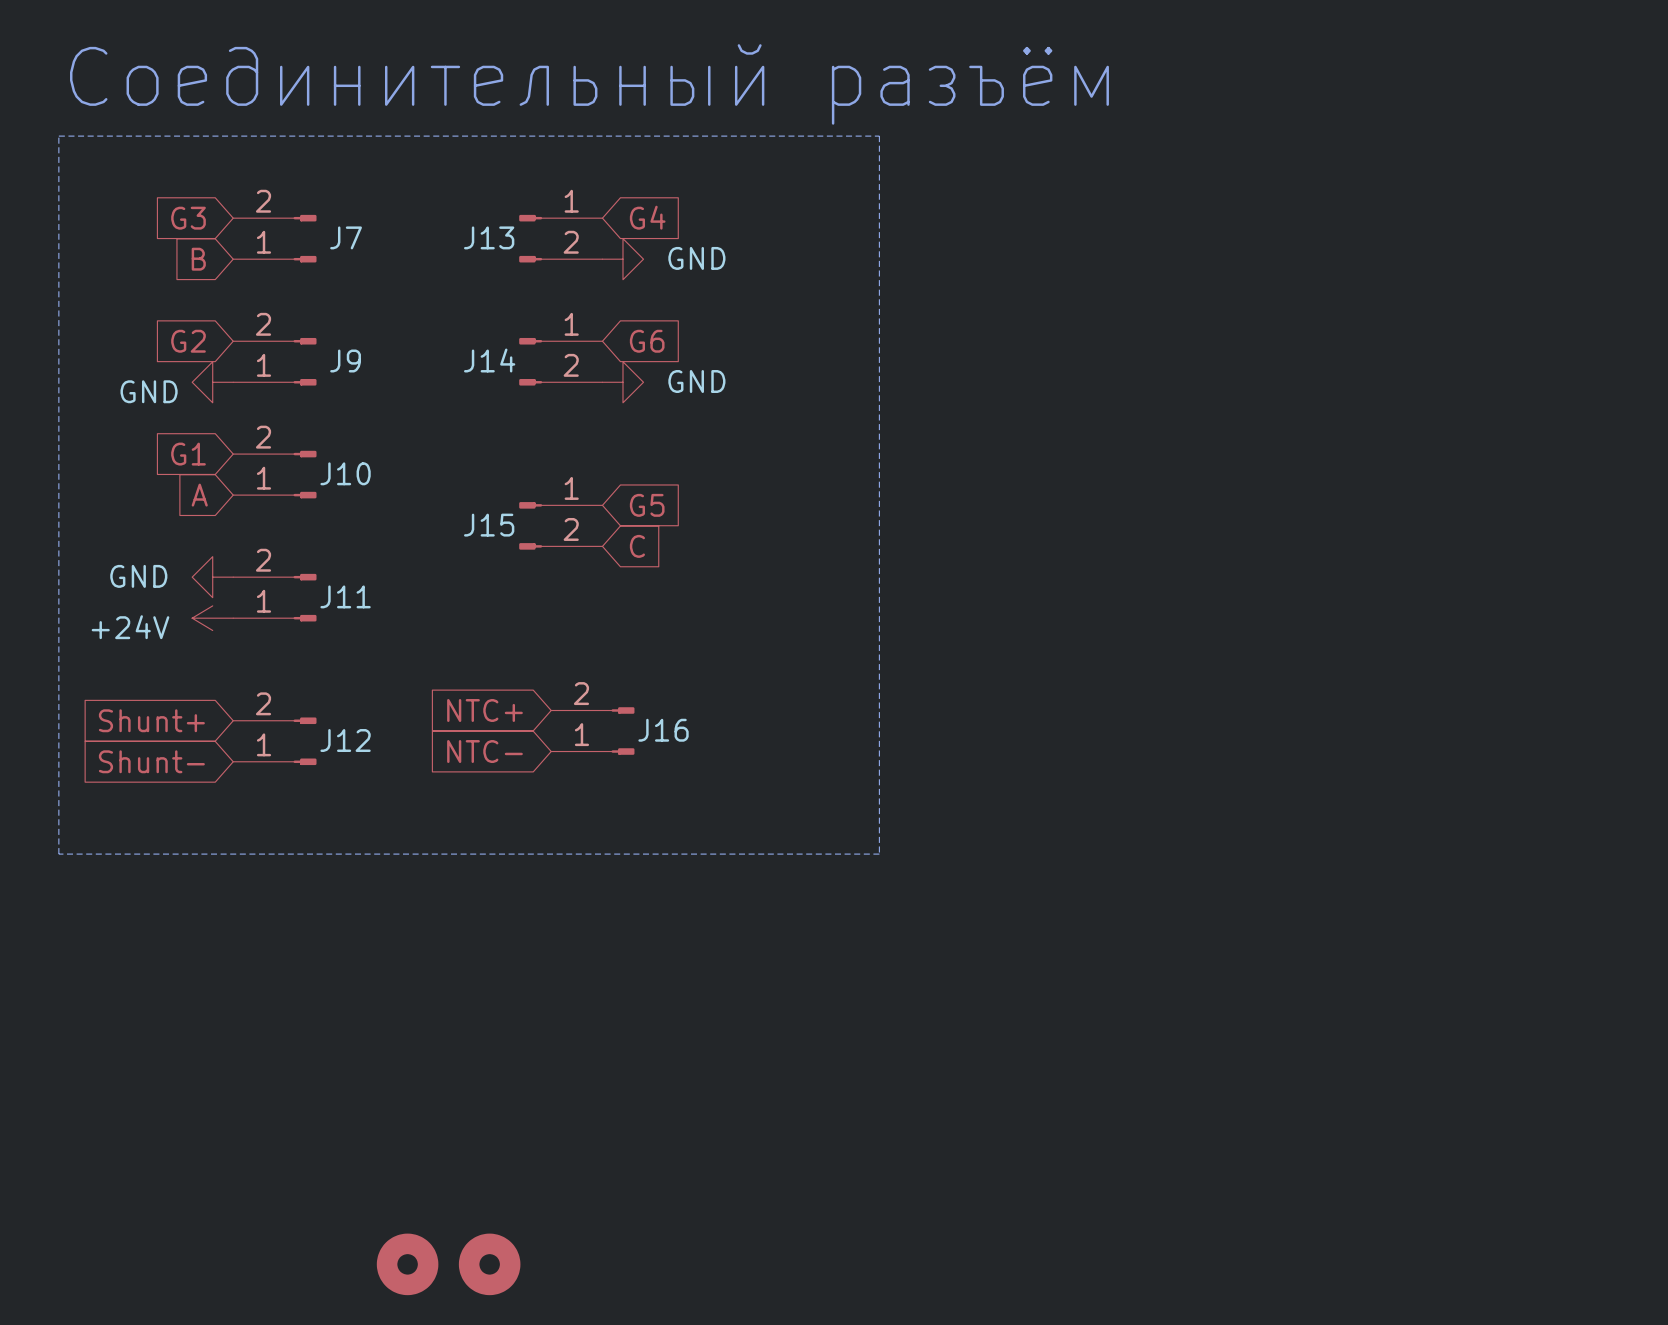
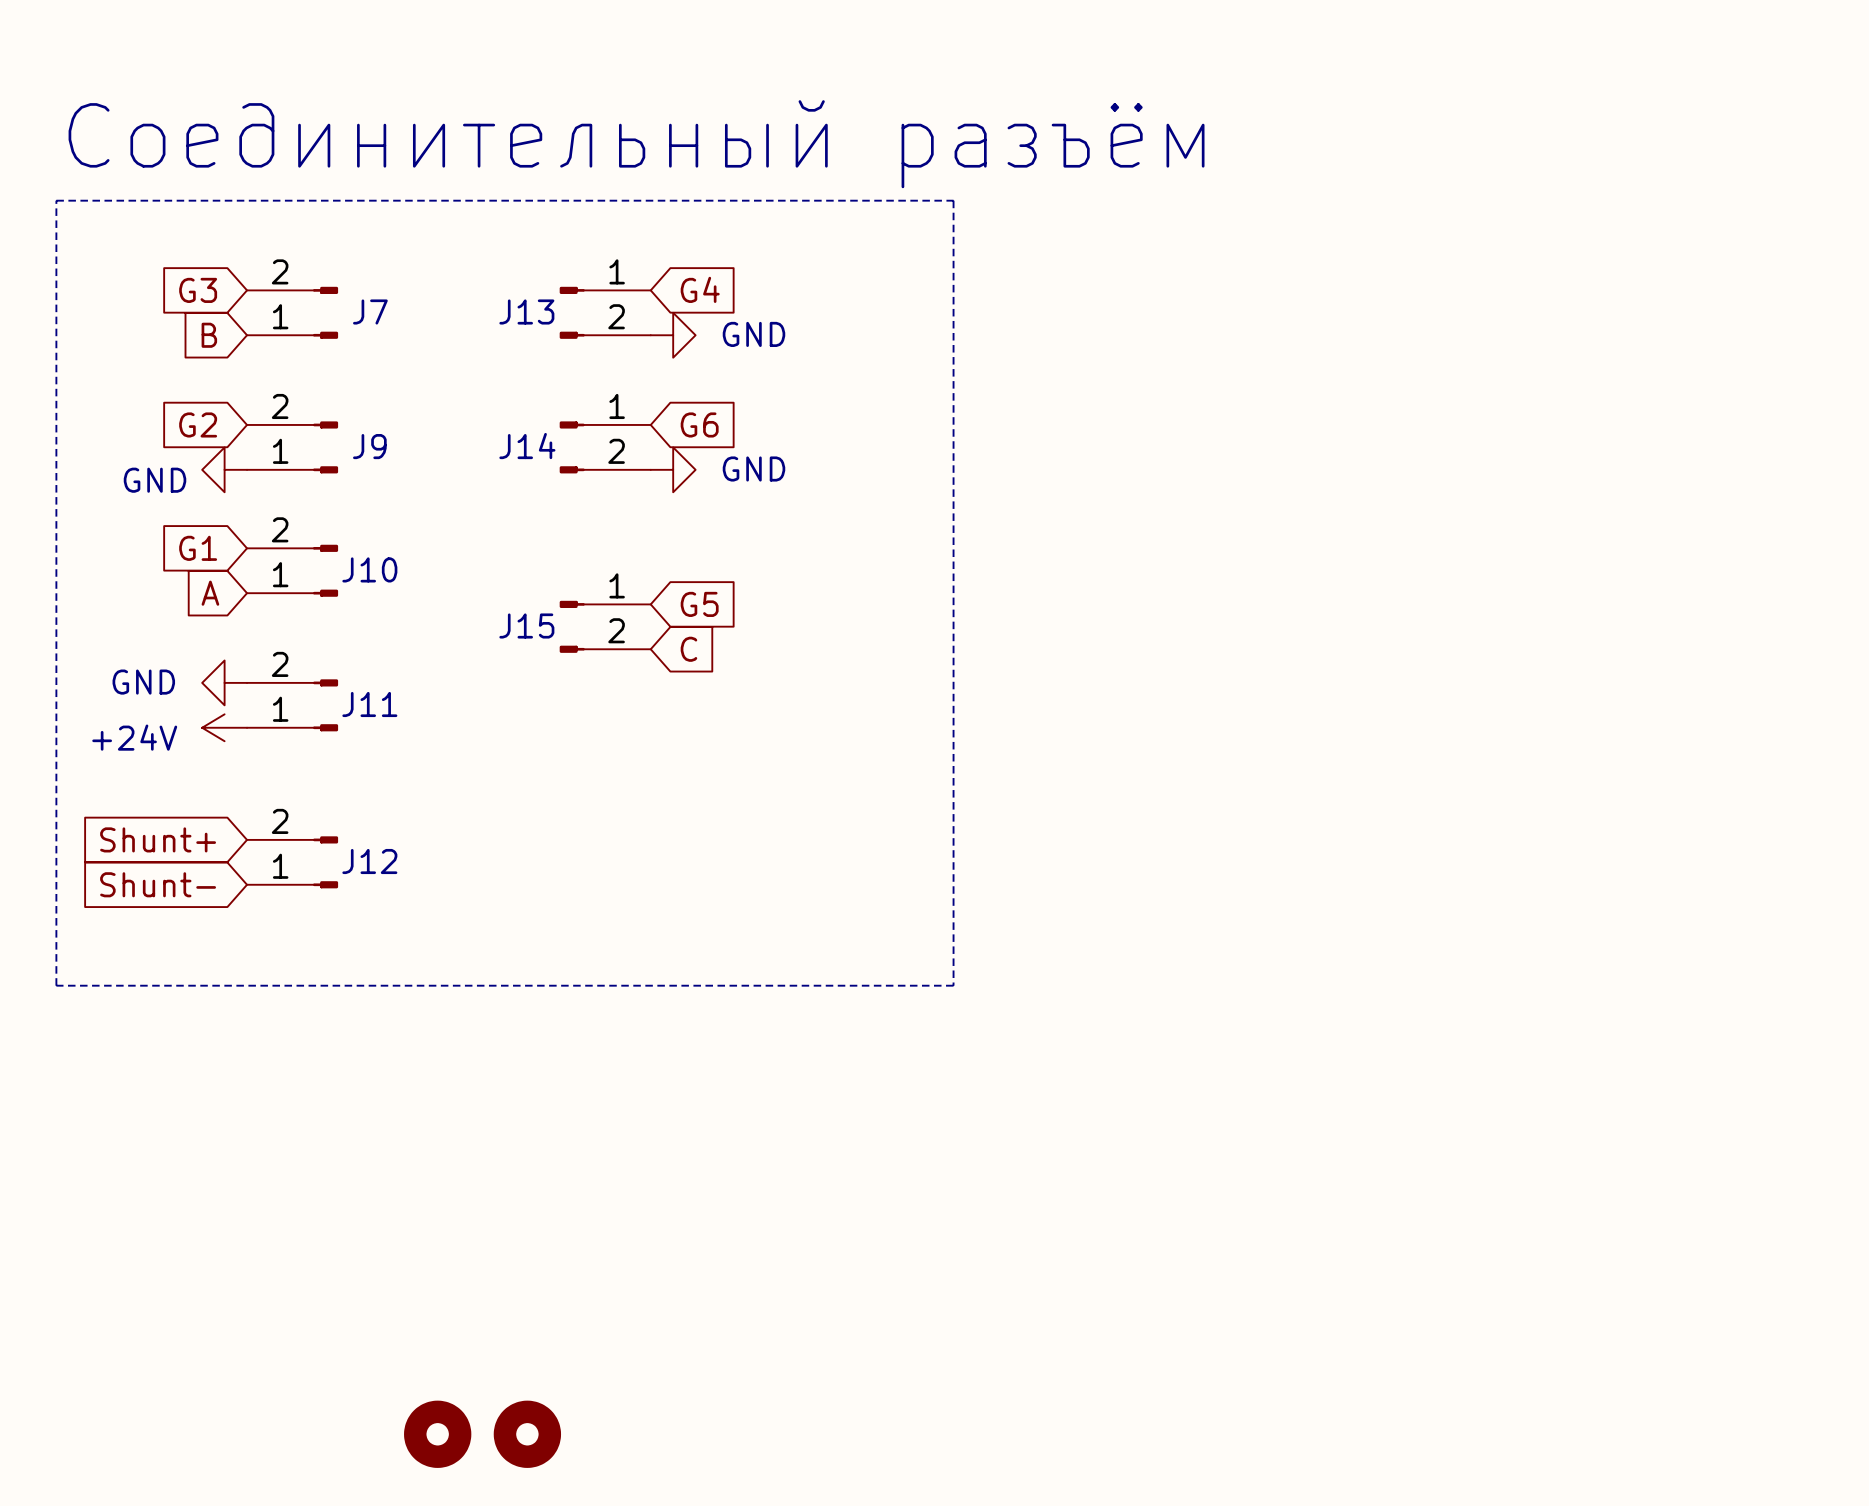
global label: NTC+ (484, 710) -> none
J16: (592, 731) -> none
global label: NTC- (484, 751) -> none

